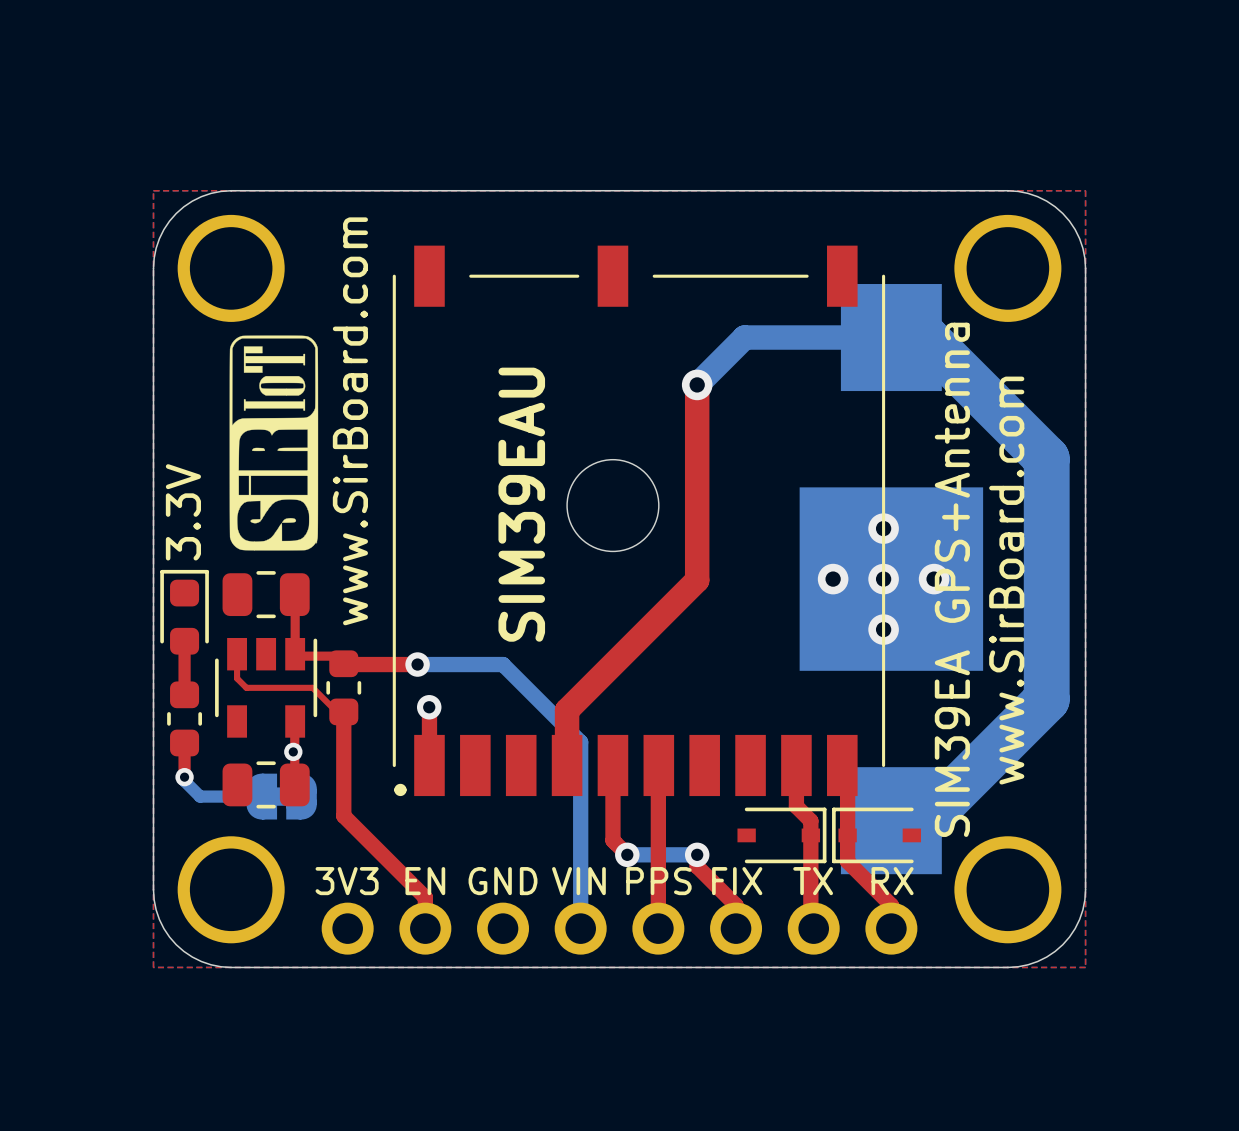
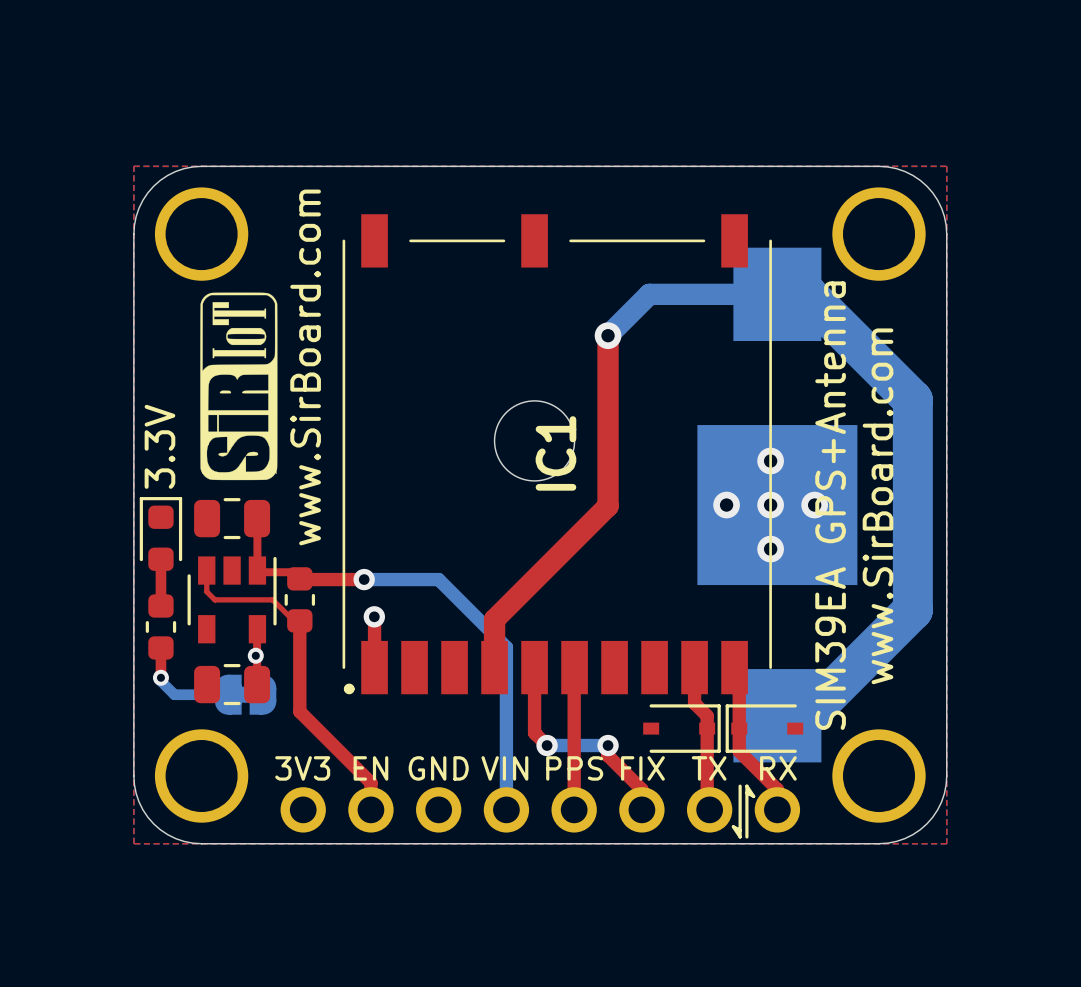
SIM39EAU name: SIM39EAU (521, 504) -> IC1 (555, 453)
line: none -> (740, 786) (740, 836) (733, 826) (740, 830) (736, 830)
line: none -> (750, 792) (746, 792) (753, 796) (746, 786) (746, 836)

